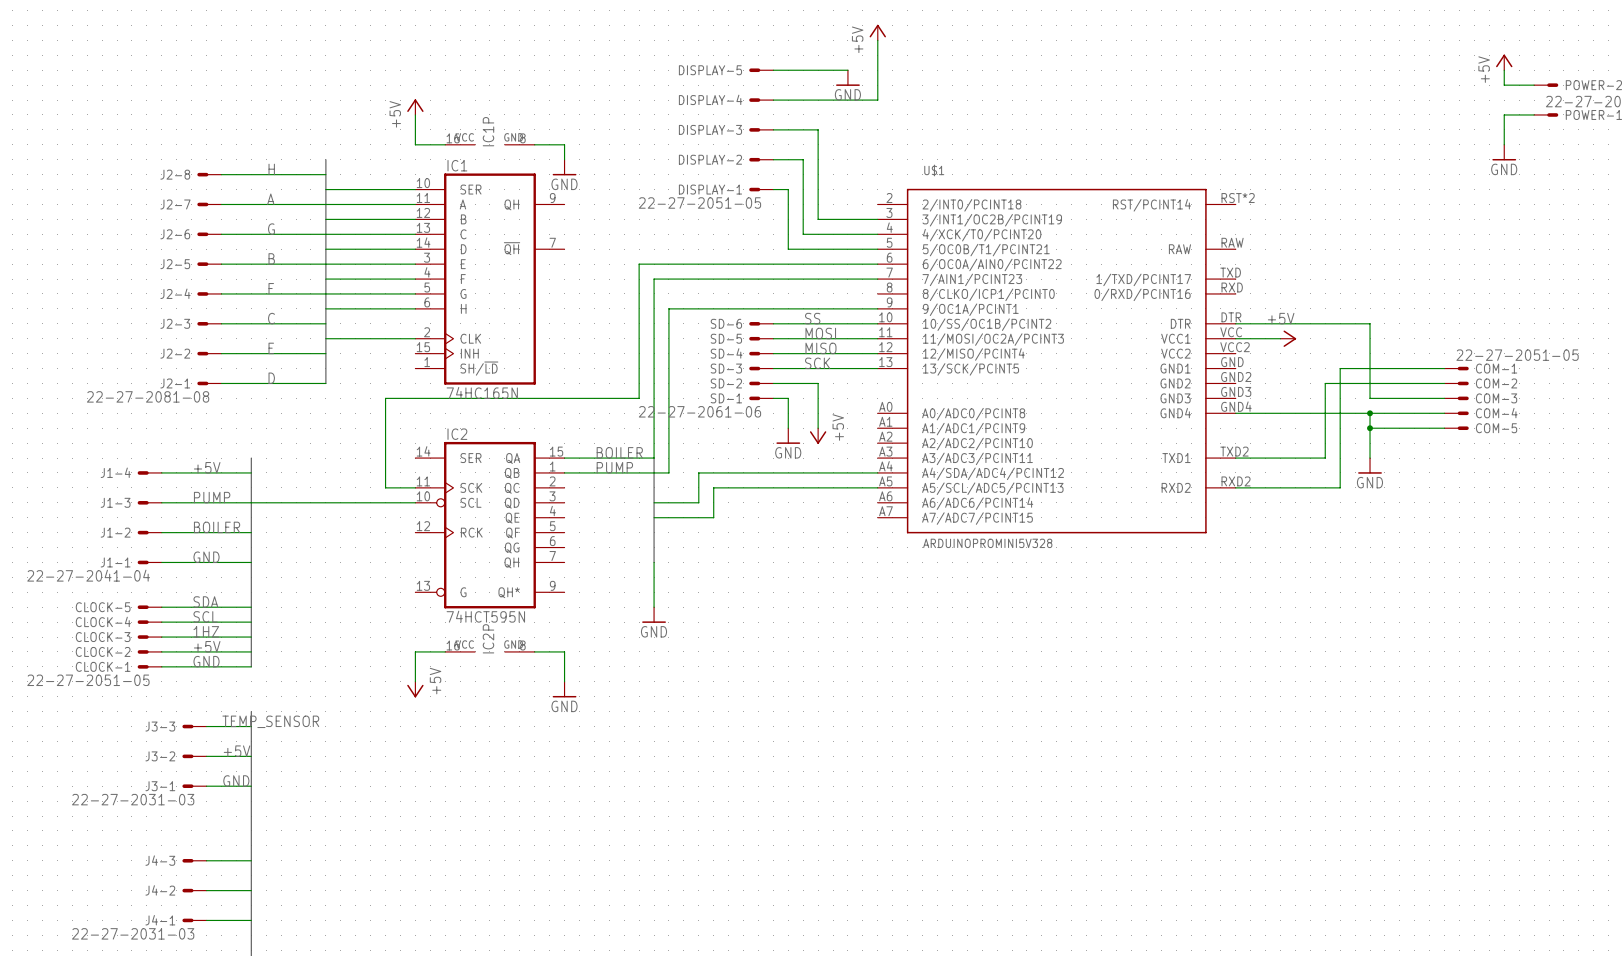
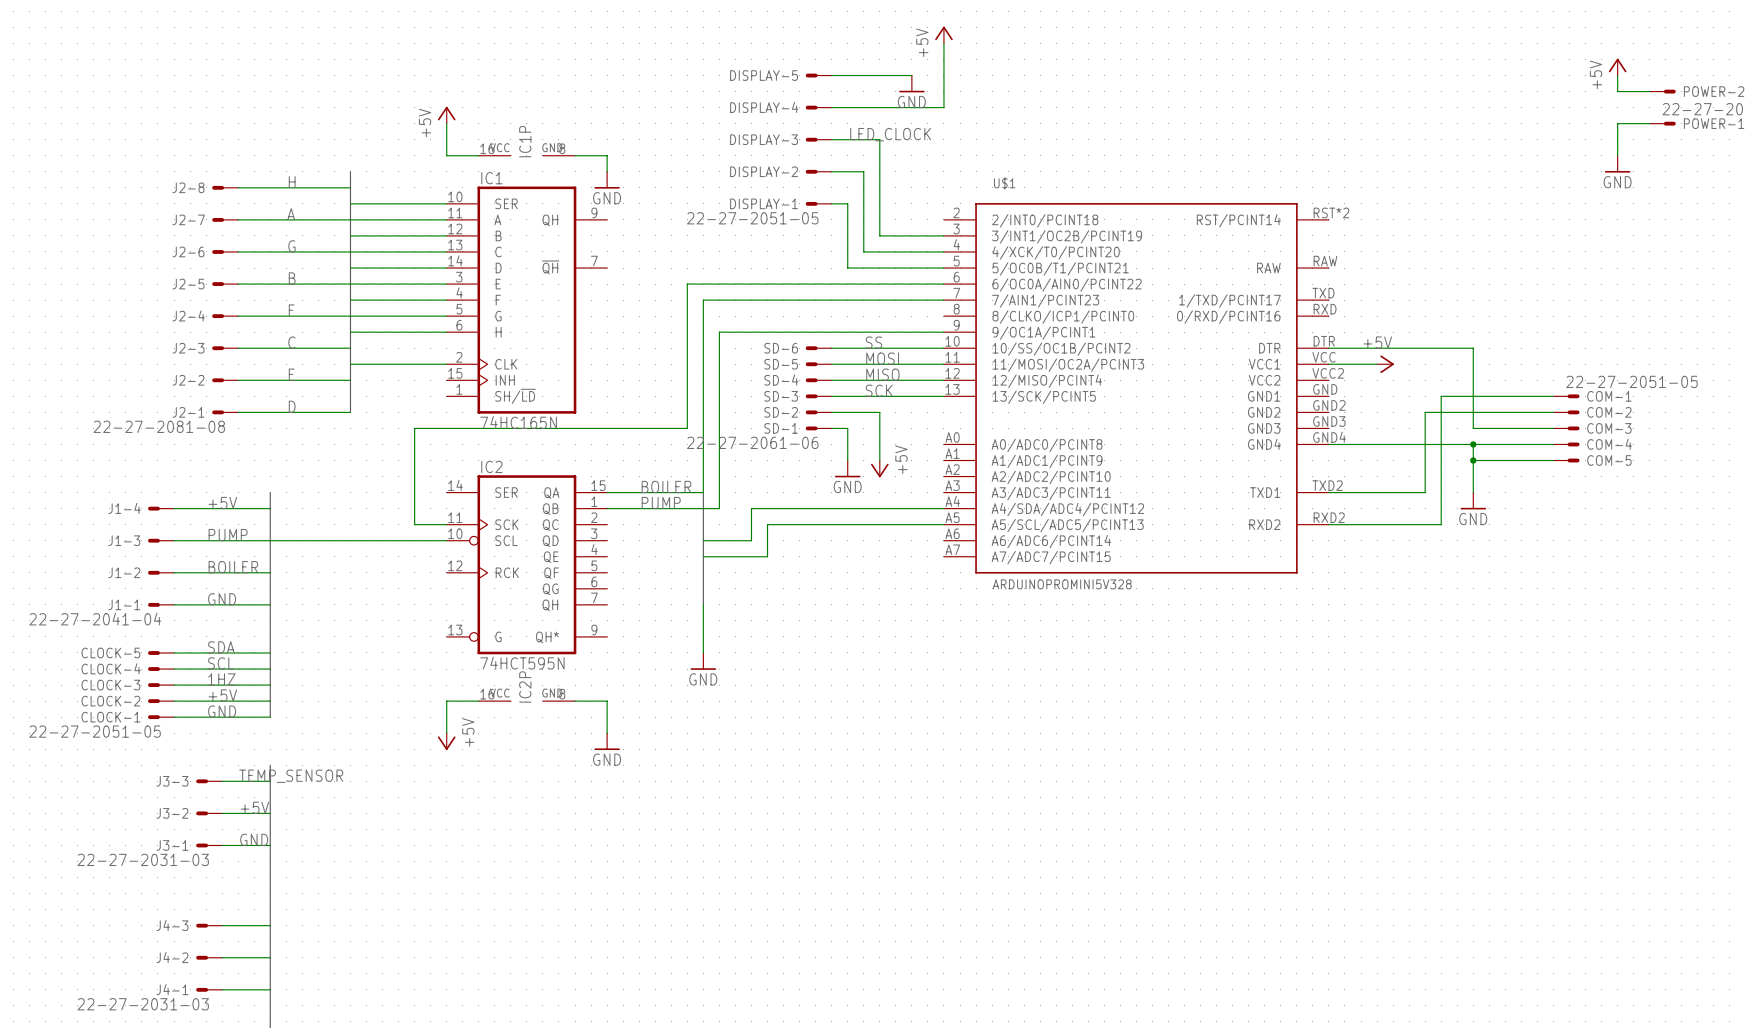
label: none -> LED_CLOCK (890, 134)

